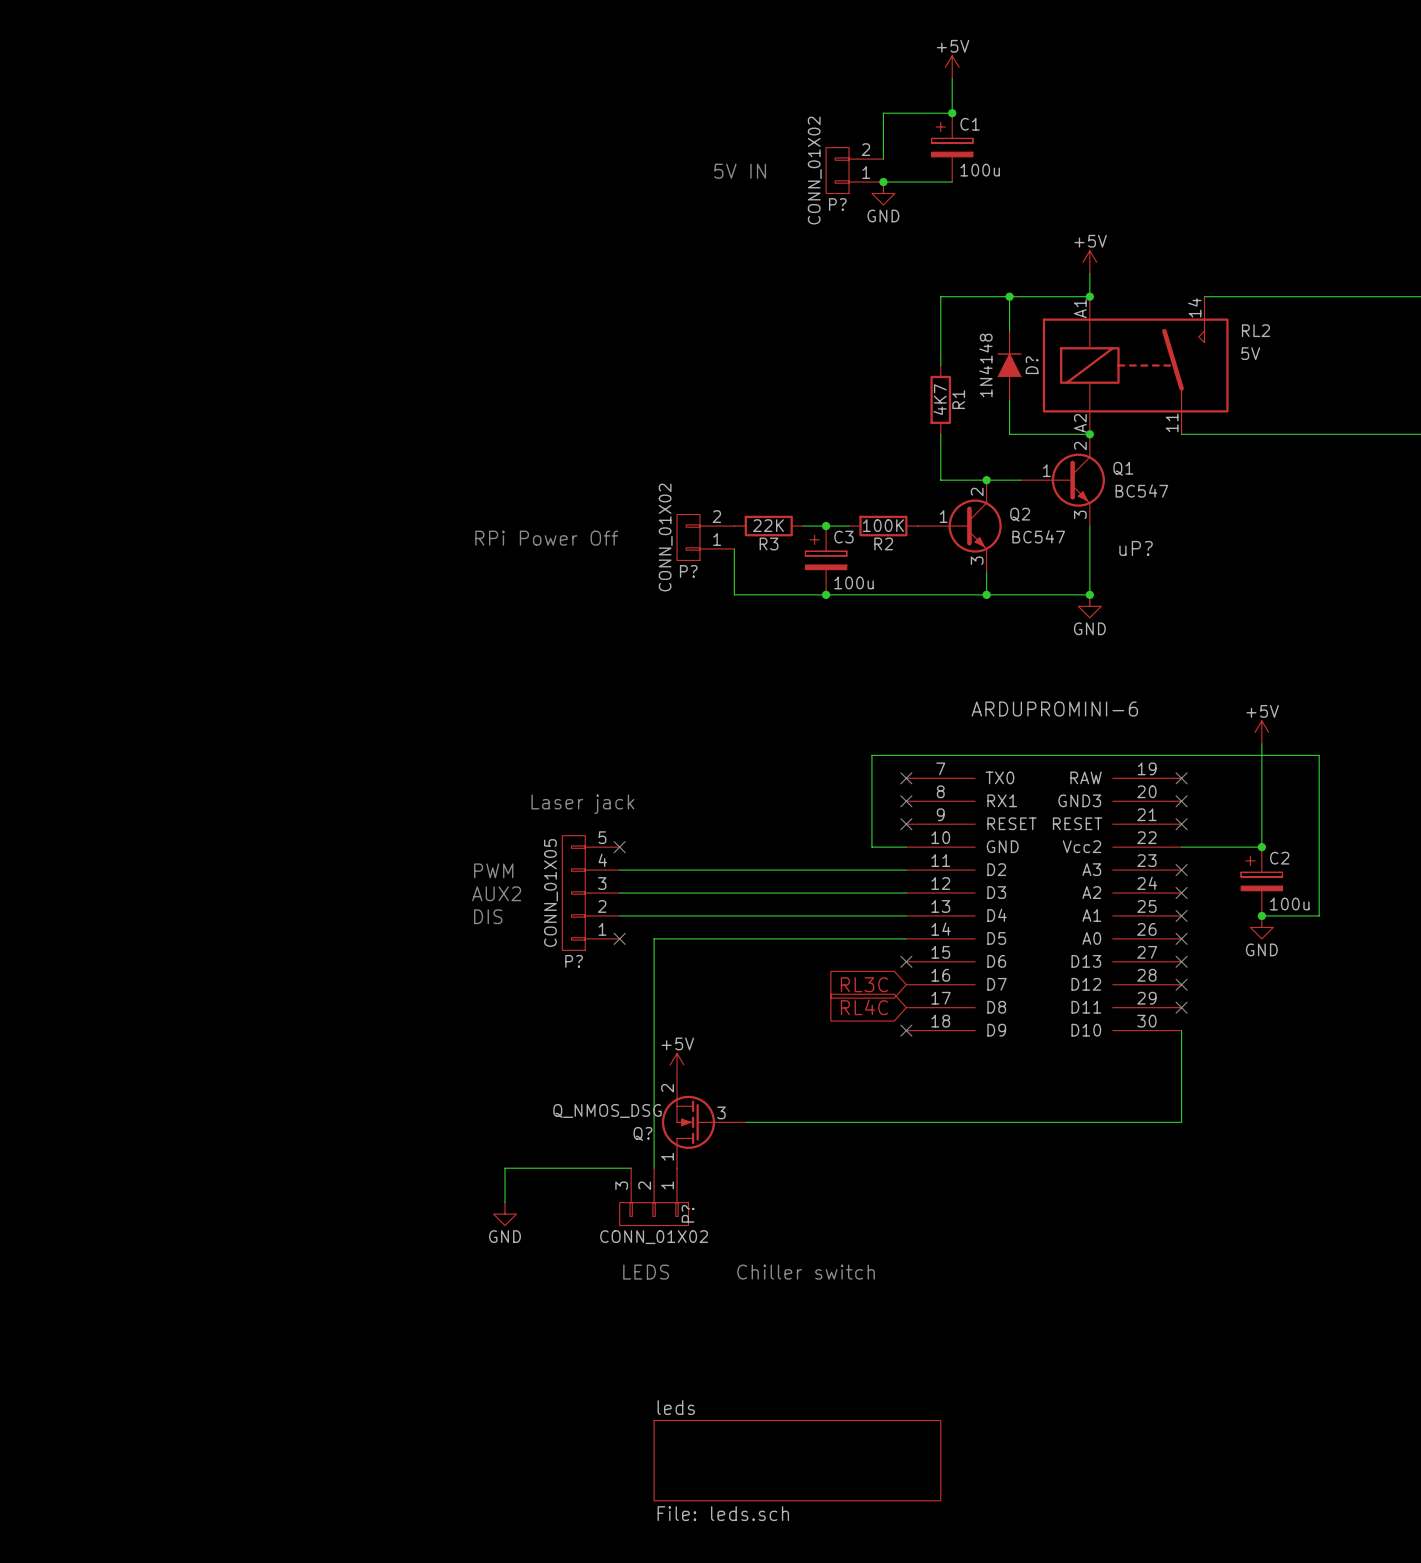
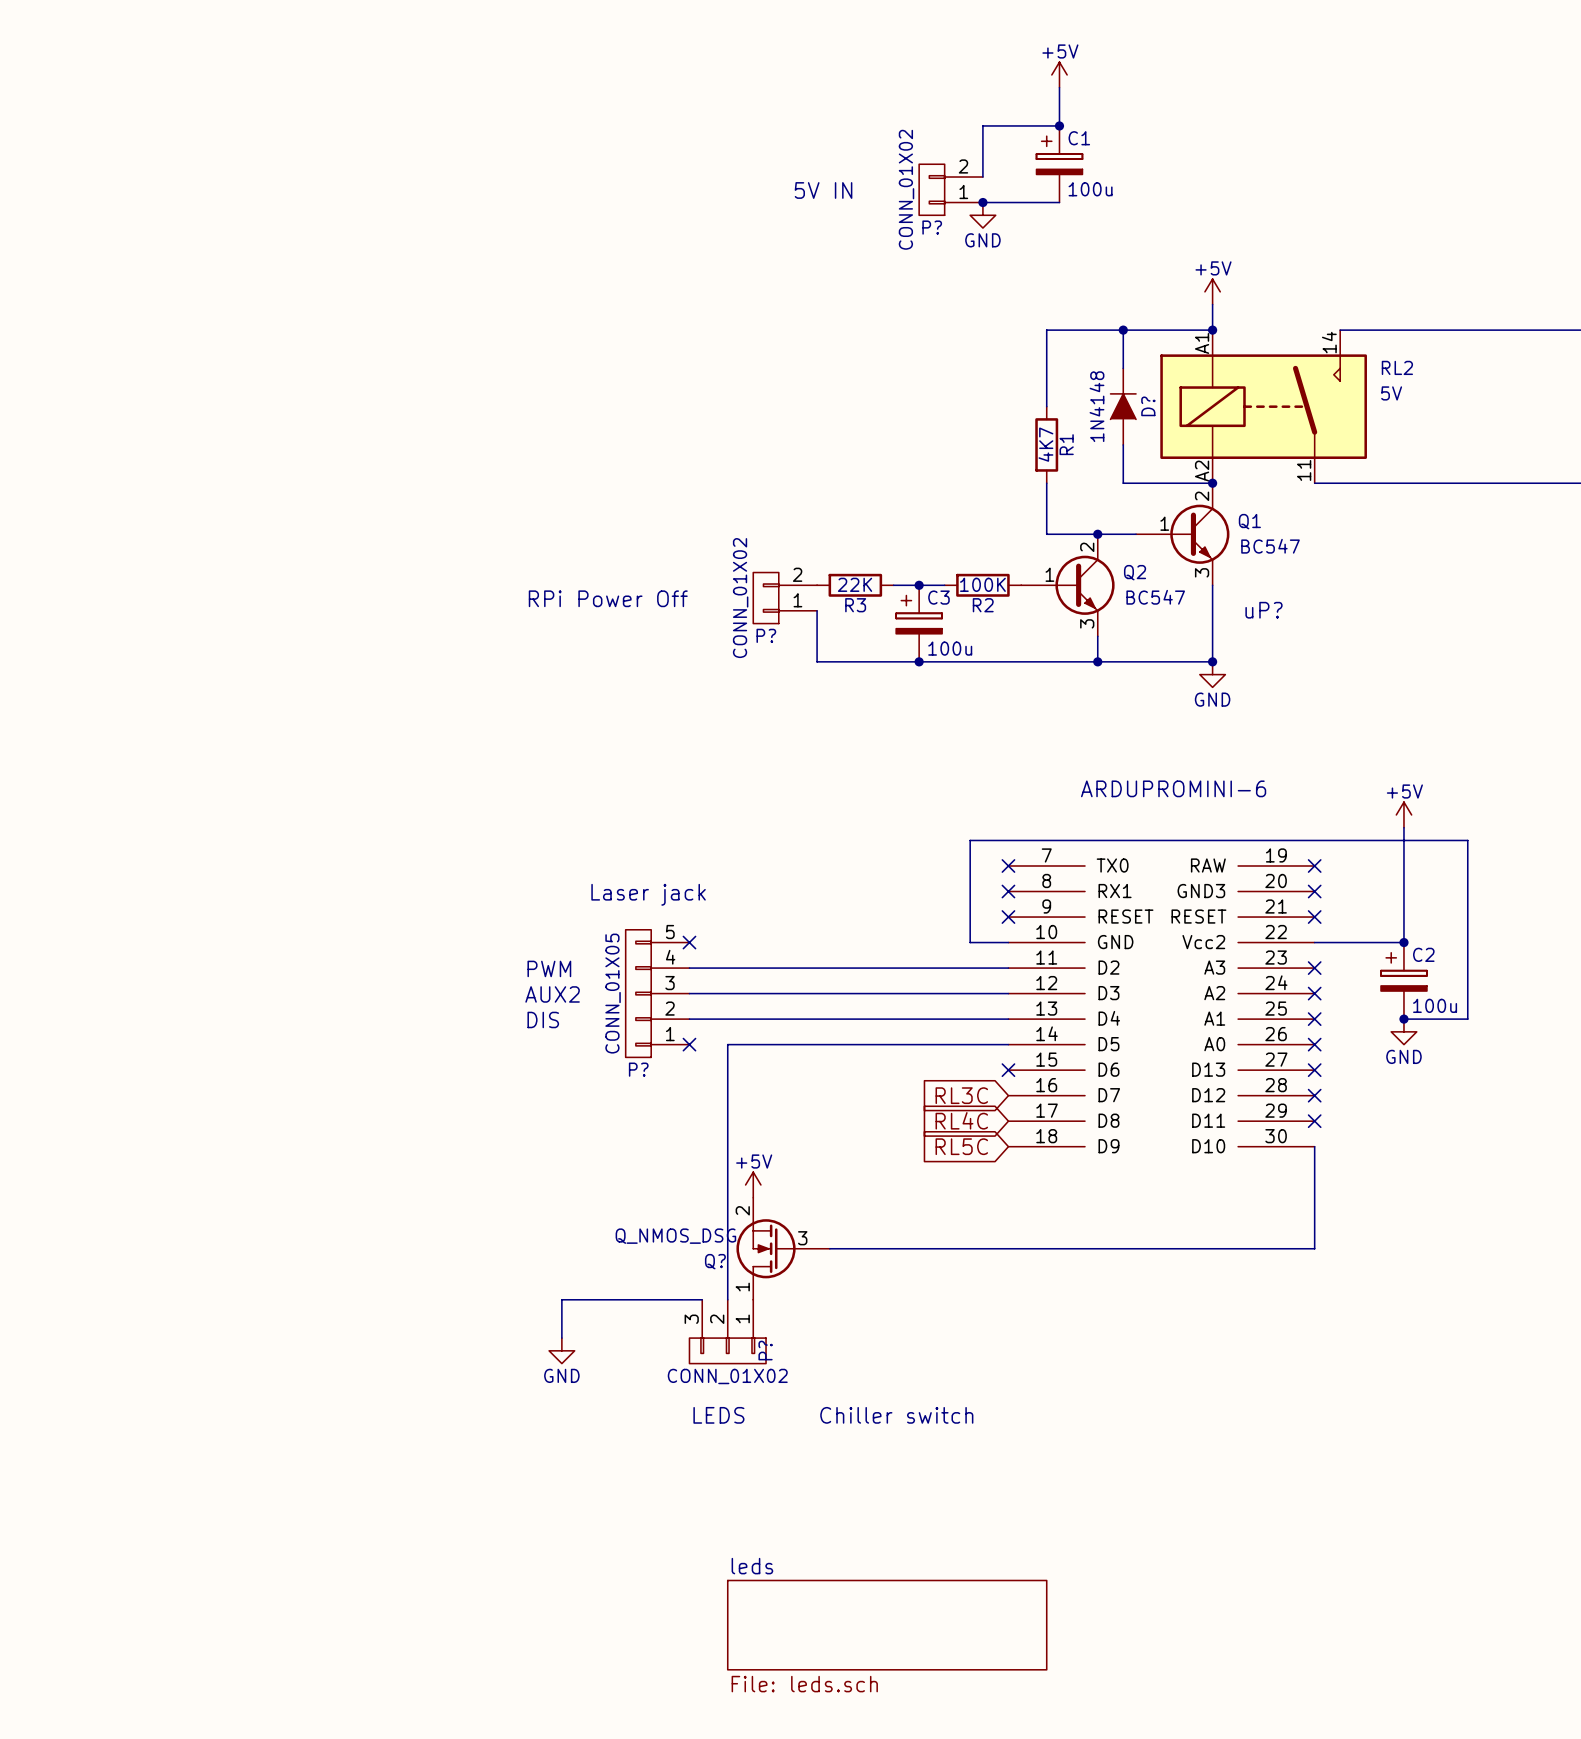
global label: none -> RL5C (961, 1146)
no-connect mark: (906, 1030) -> none

